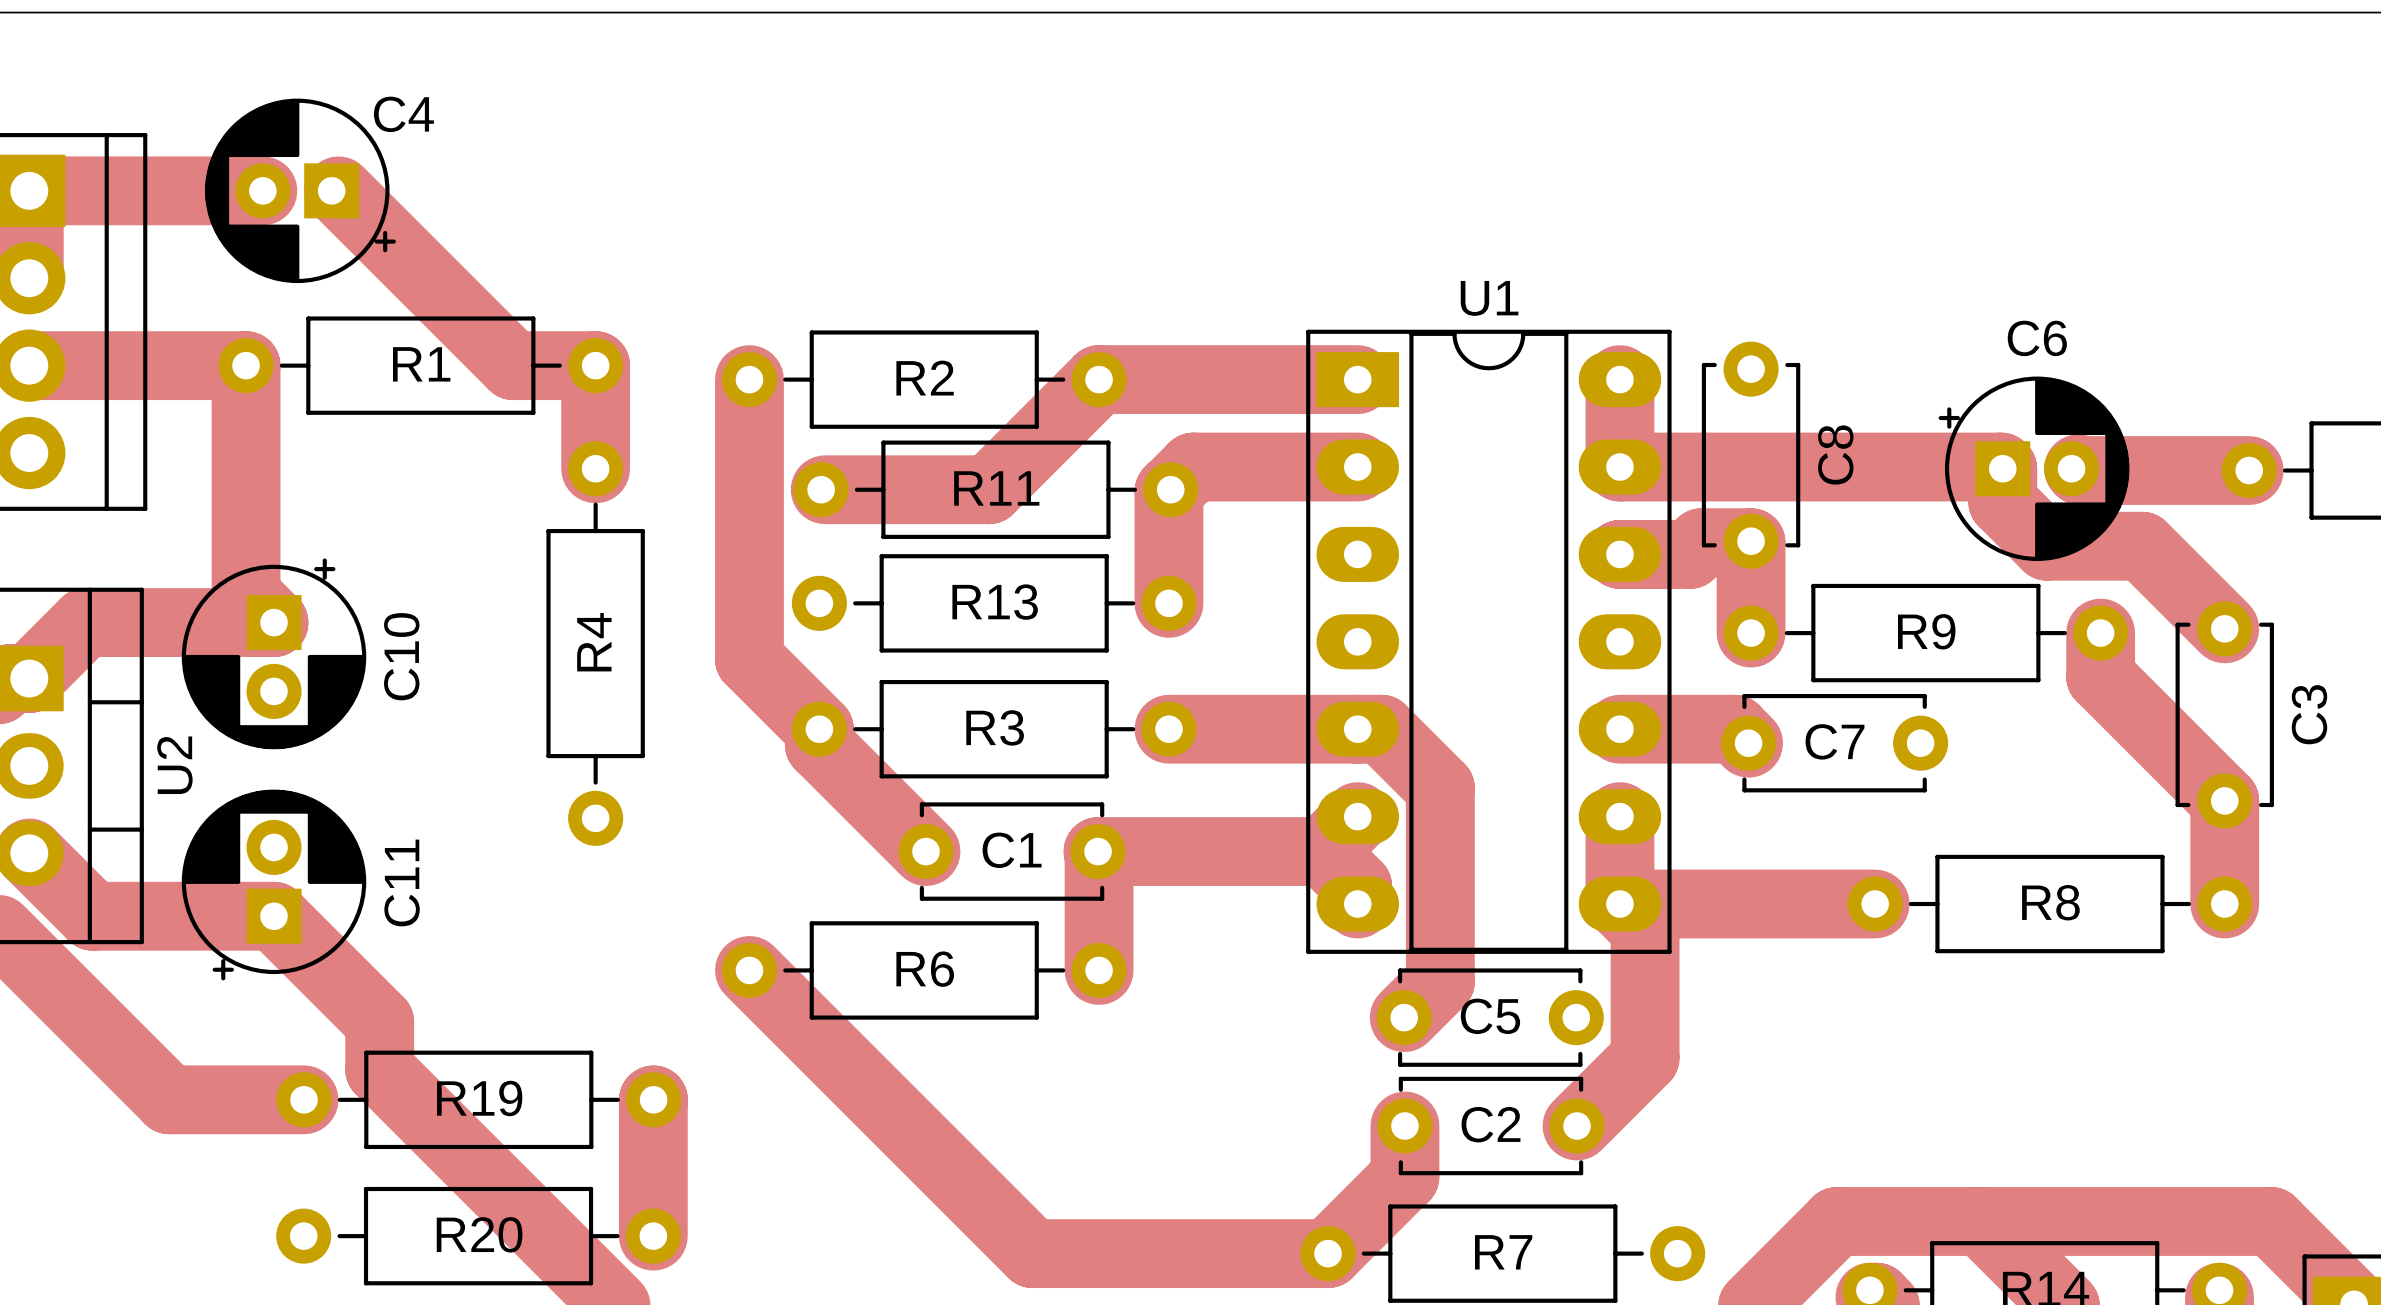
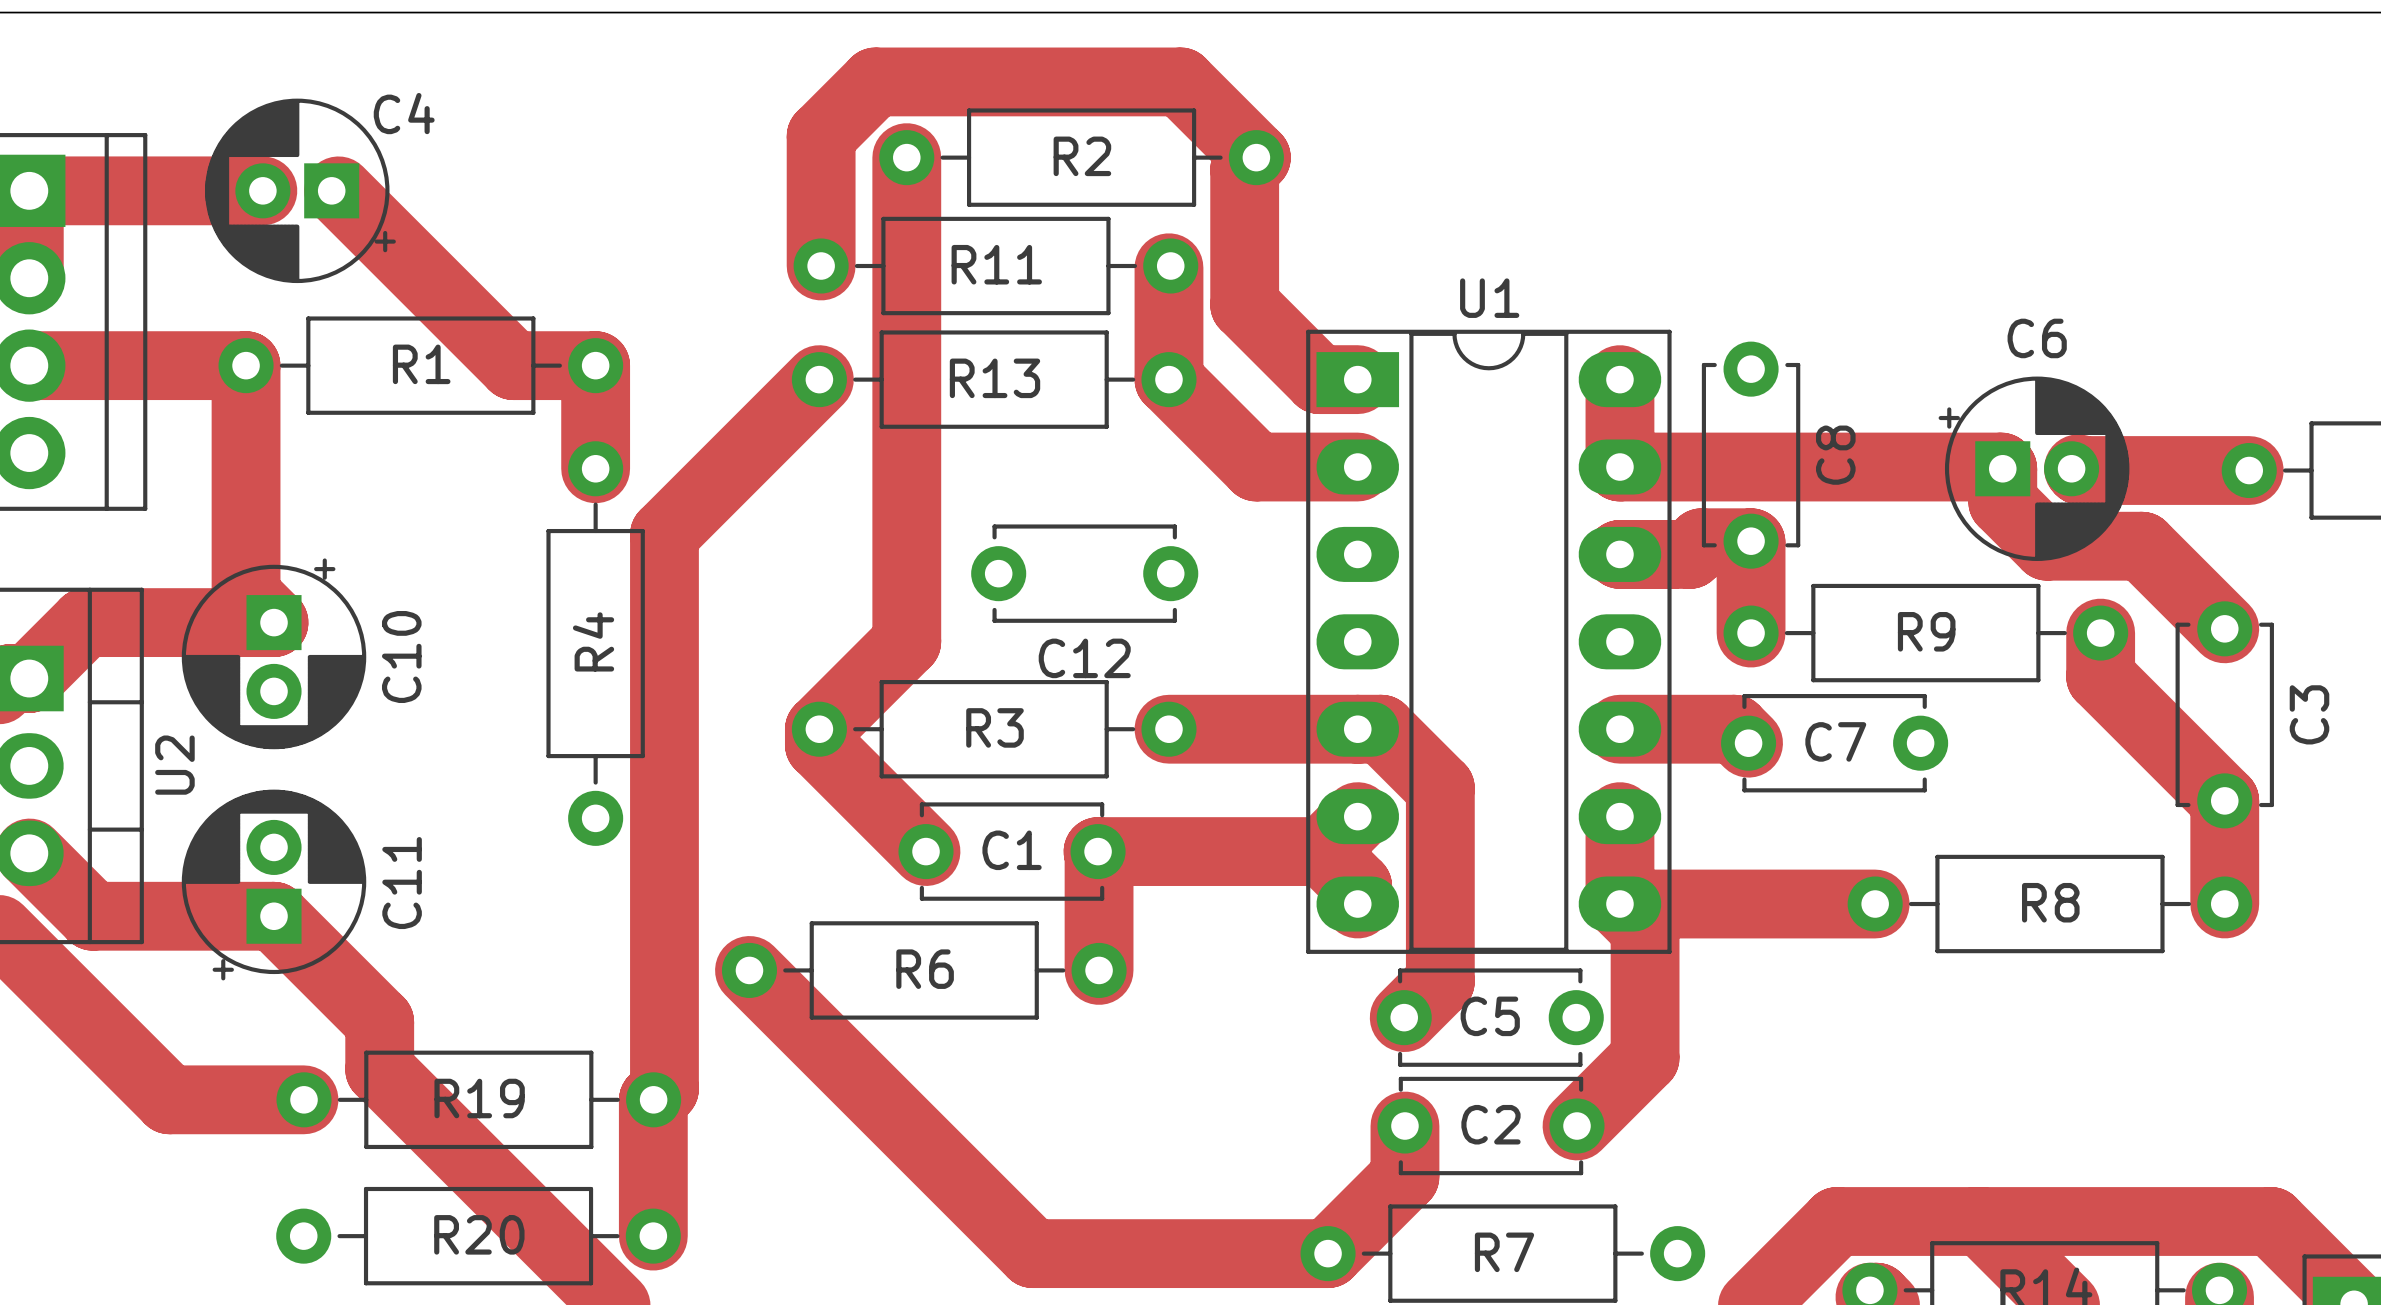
track: (749, 379) (749, 659) (819, 729) -> (906, 157) (906, 641) (819, 729)
track: none -> (819, 379) (664, 534) (664, 1088) (653, 1099)
R2 position: (924, 379) -> (1081, 157)
track: (1319, 379) (1099, 379) (988, 489) (825, 489) -> (1319, 379) (1244, 304) (1244, 169) (1256, 157) (1180, 81) (875, 81) (821, 136) (821, 266)
track: (1256, 467) (1193, 467) (1168, 491) (1168, 603) -> (1256, 467) (1168, 379) (1168, 267)
R11 position: (995, 489) -> (995, 266)
C12: none -> (1084, 573)
R13 position: (994, 603) -> (994, 379)

